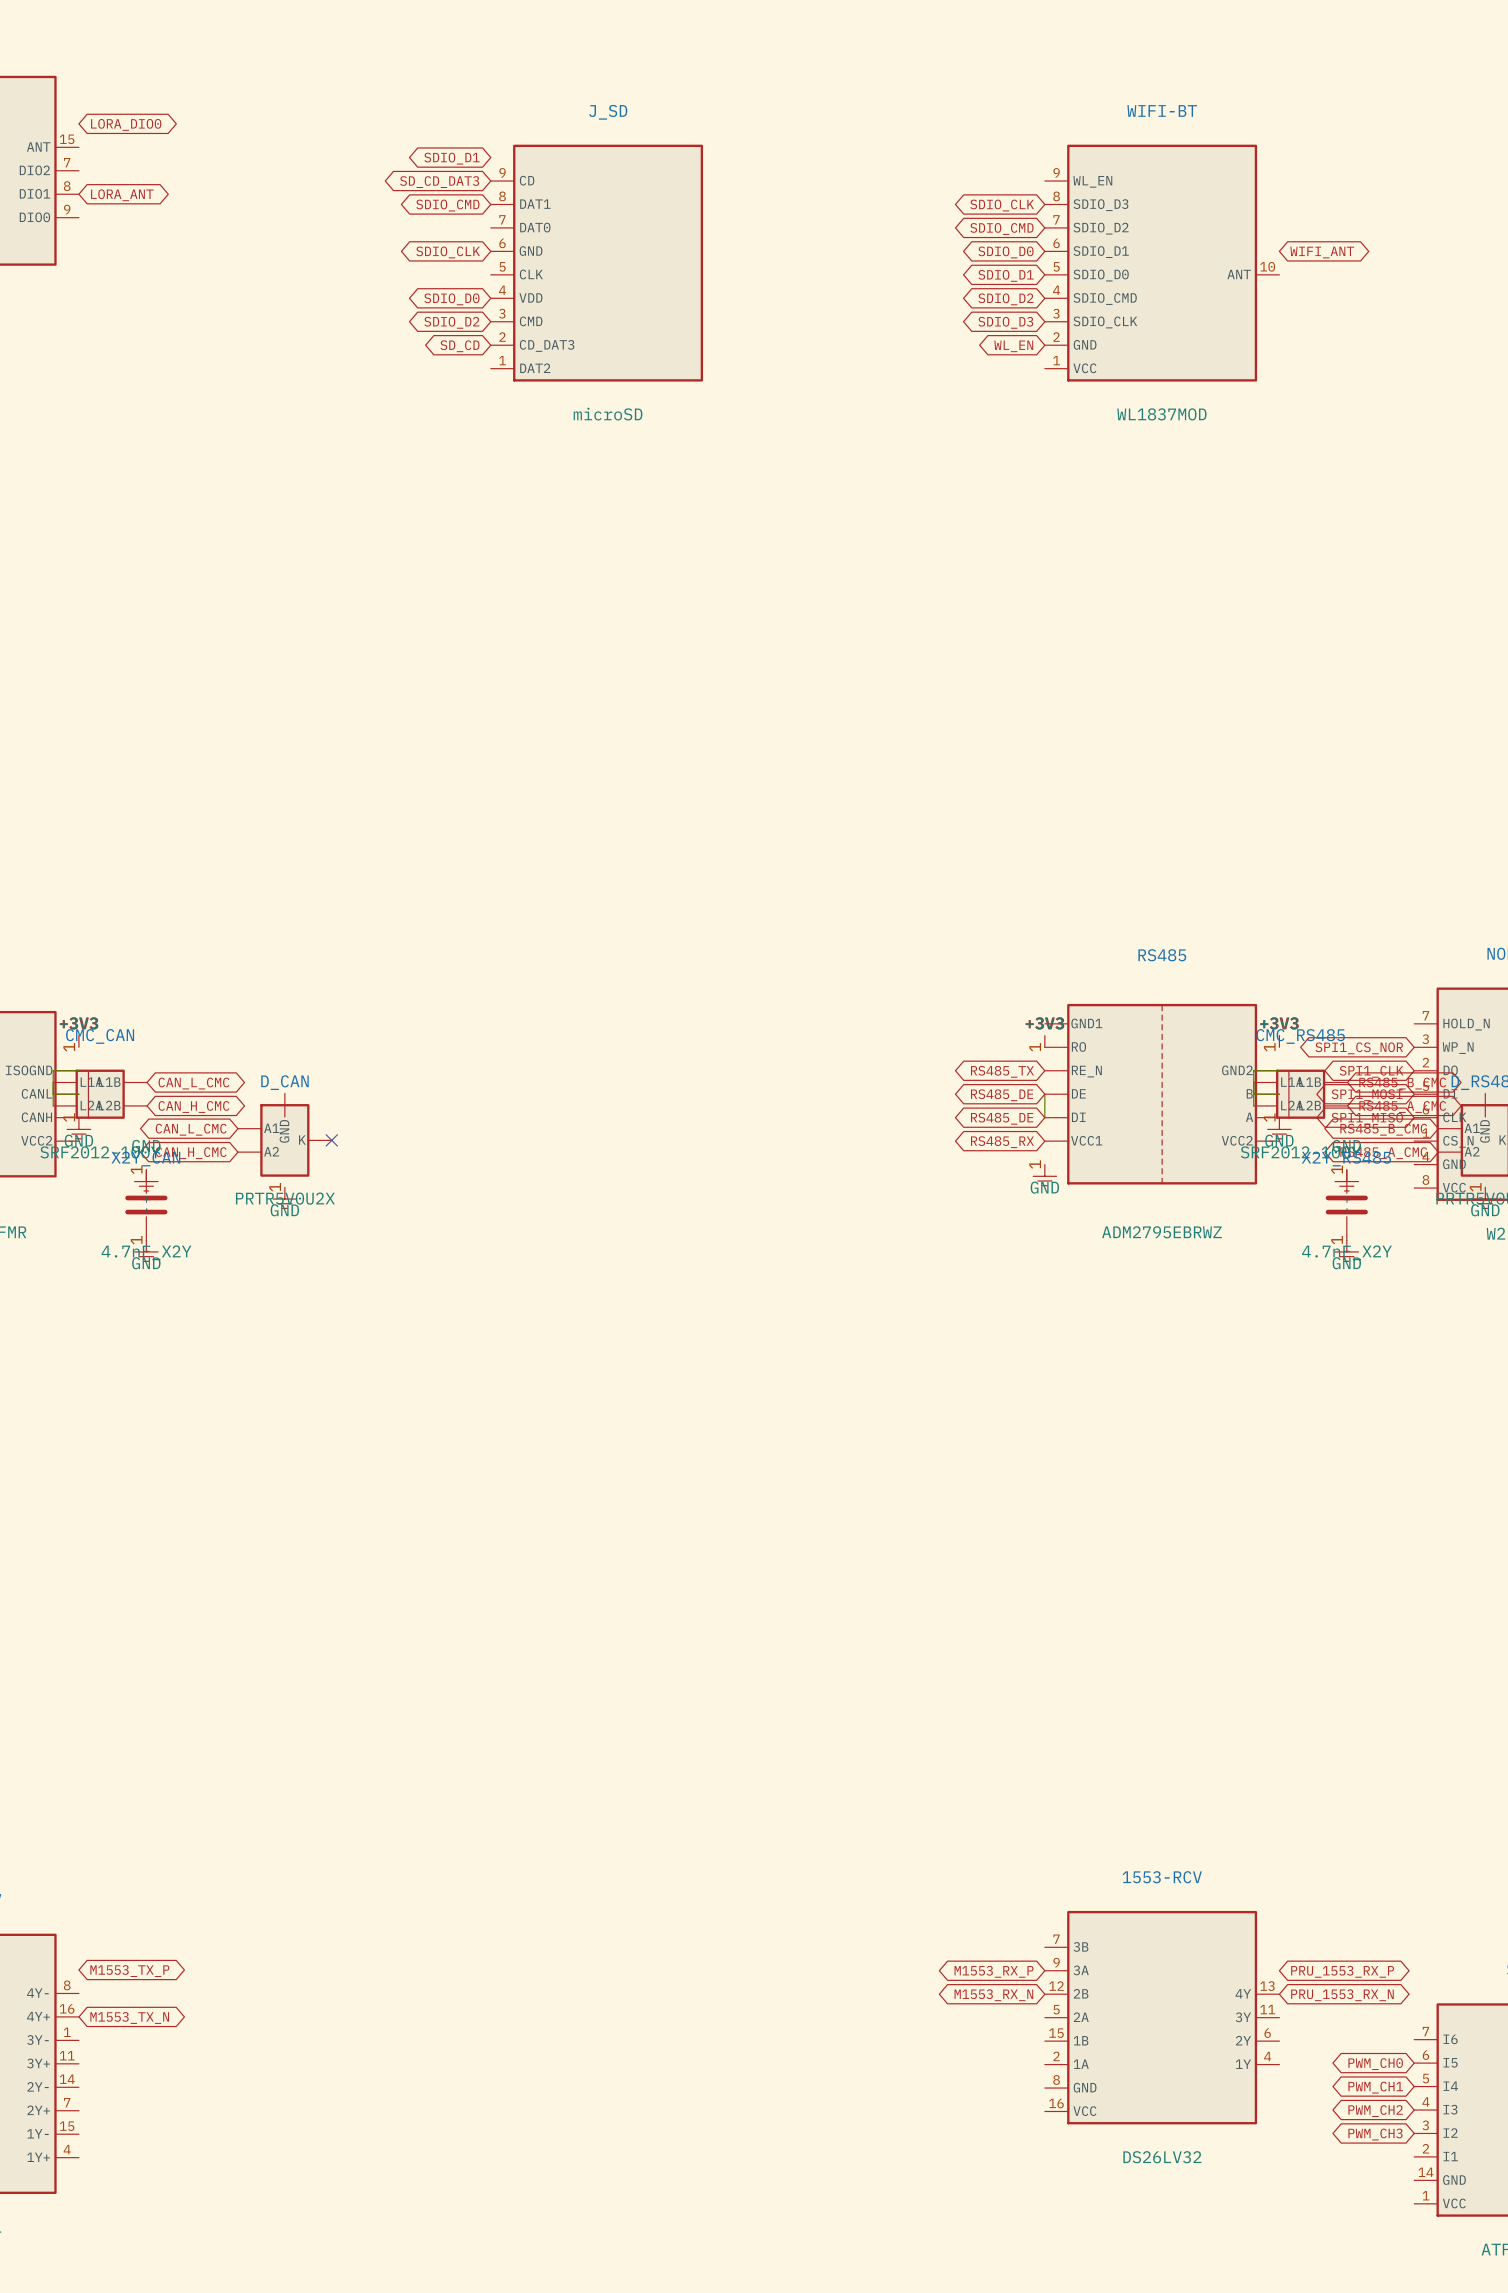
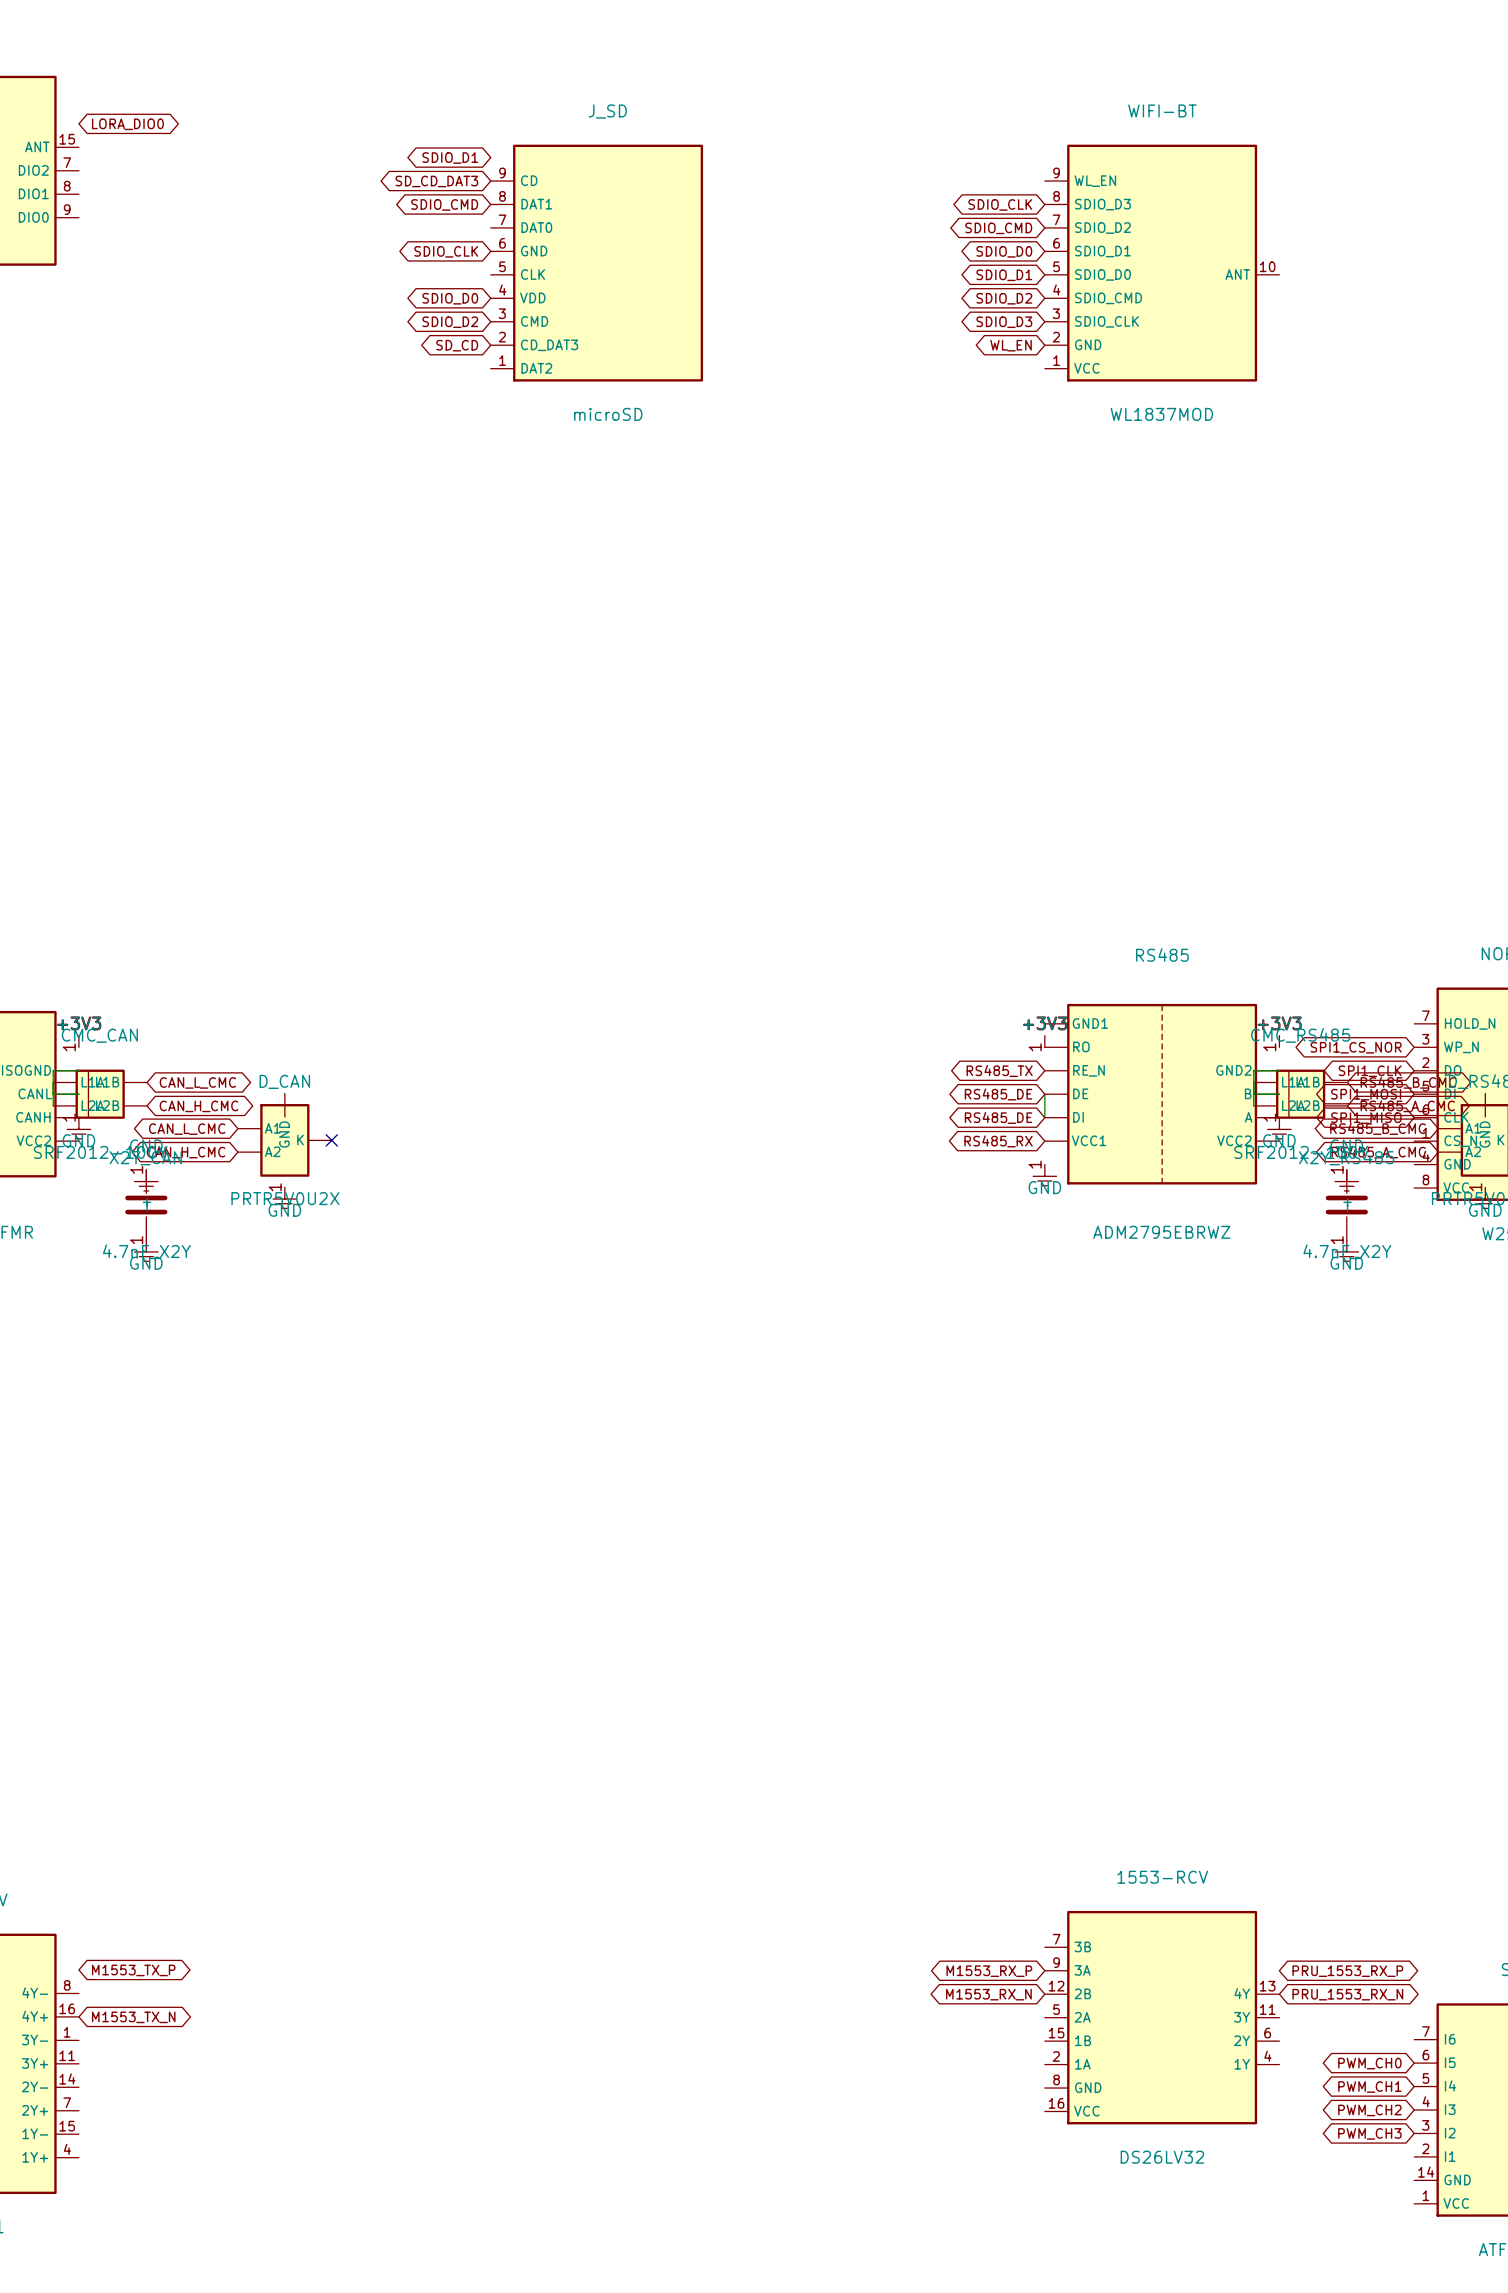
global label: LORA_ANT (122, 195) -> none
global label: WIFI_ANT (1322, 252) -> none

